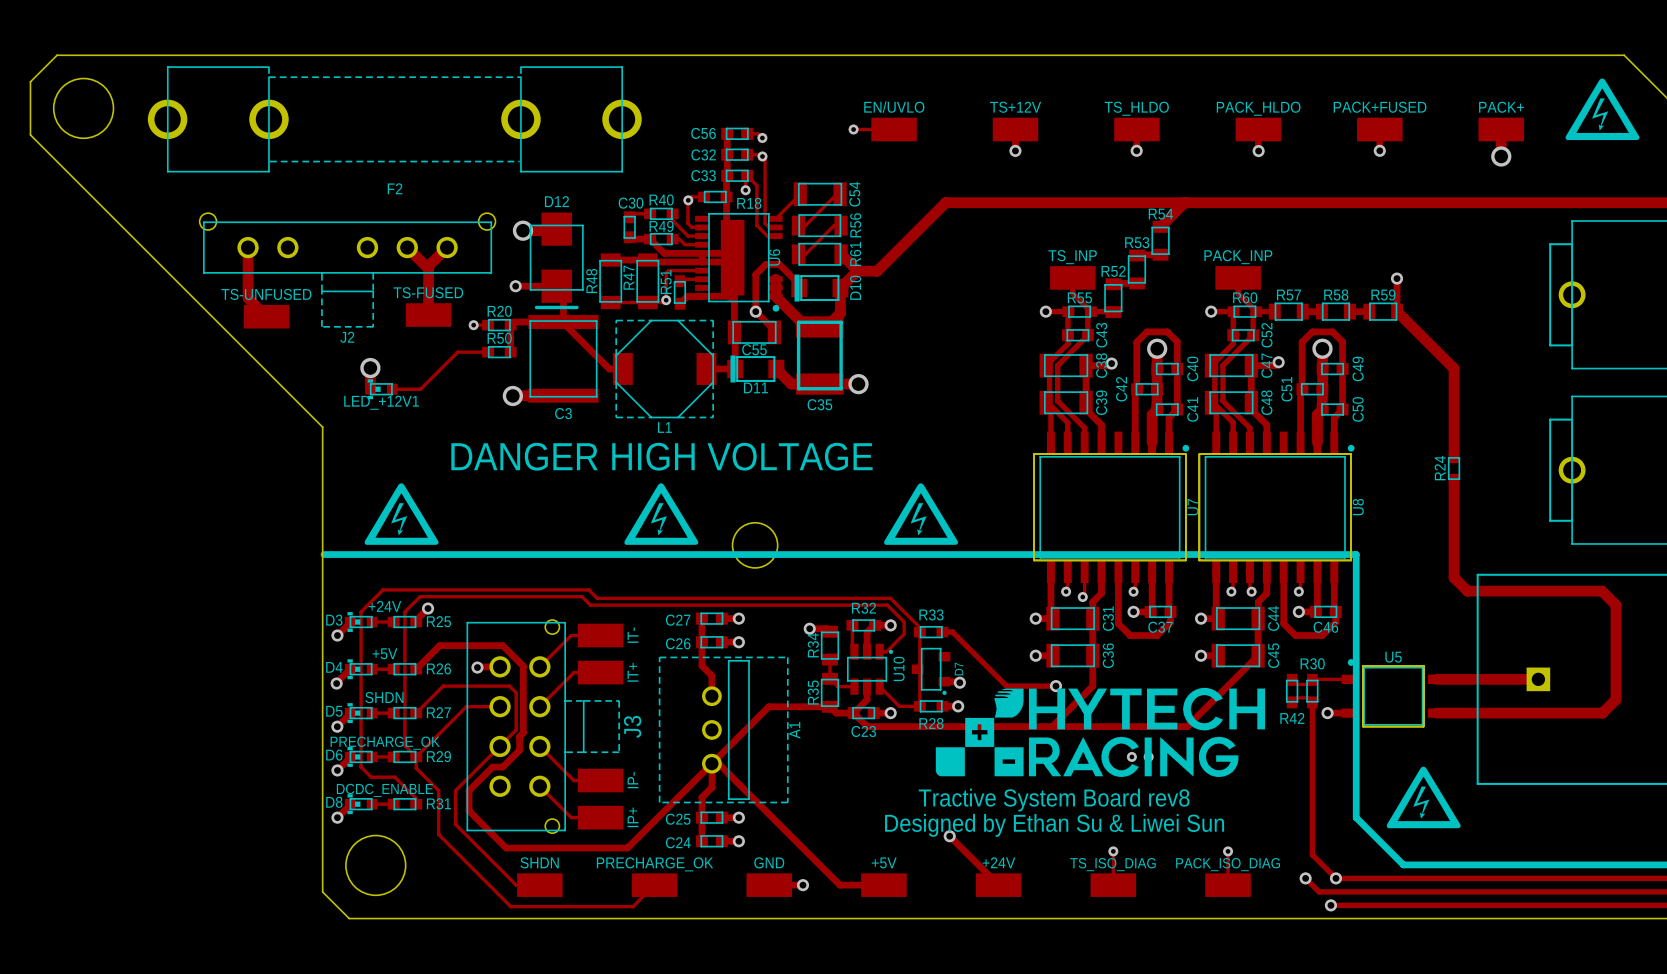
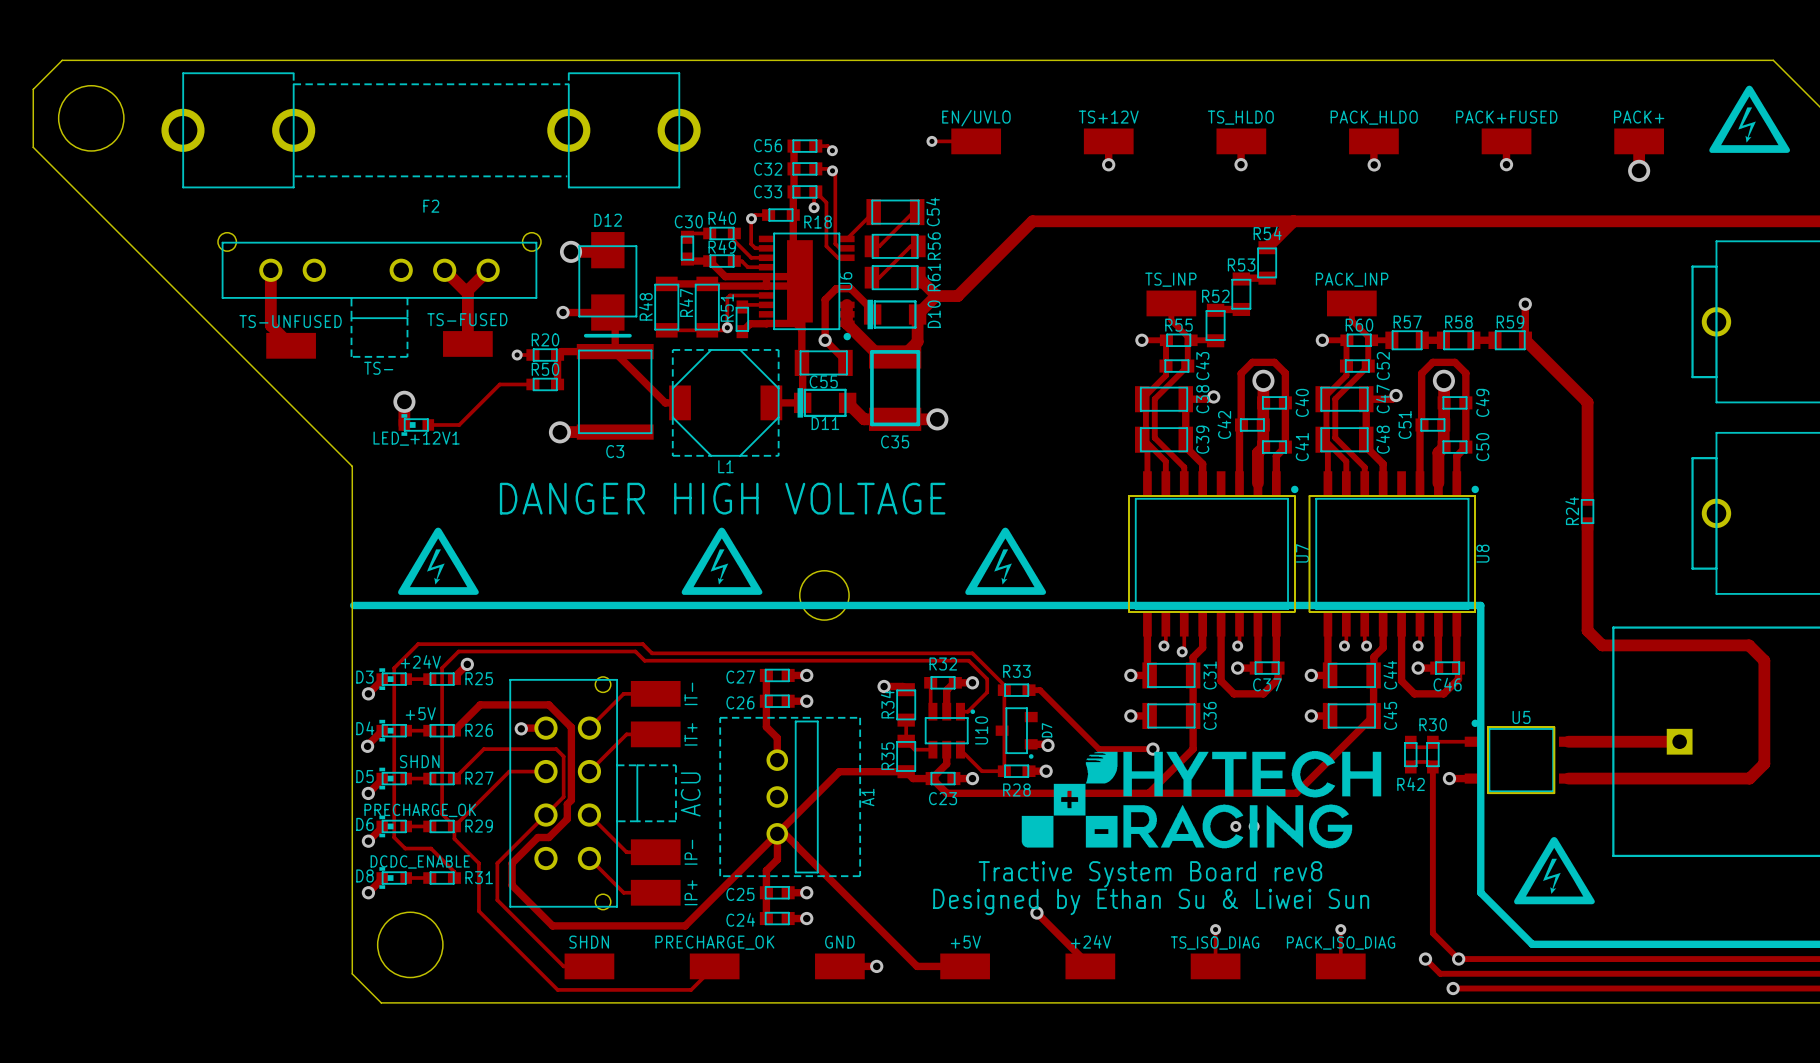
J2 name: J2 (347, 337) -> TS- (378, 368)
J3 name: J3 (632, 726) -> ACU (690, 794)

